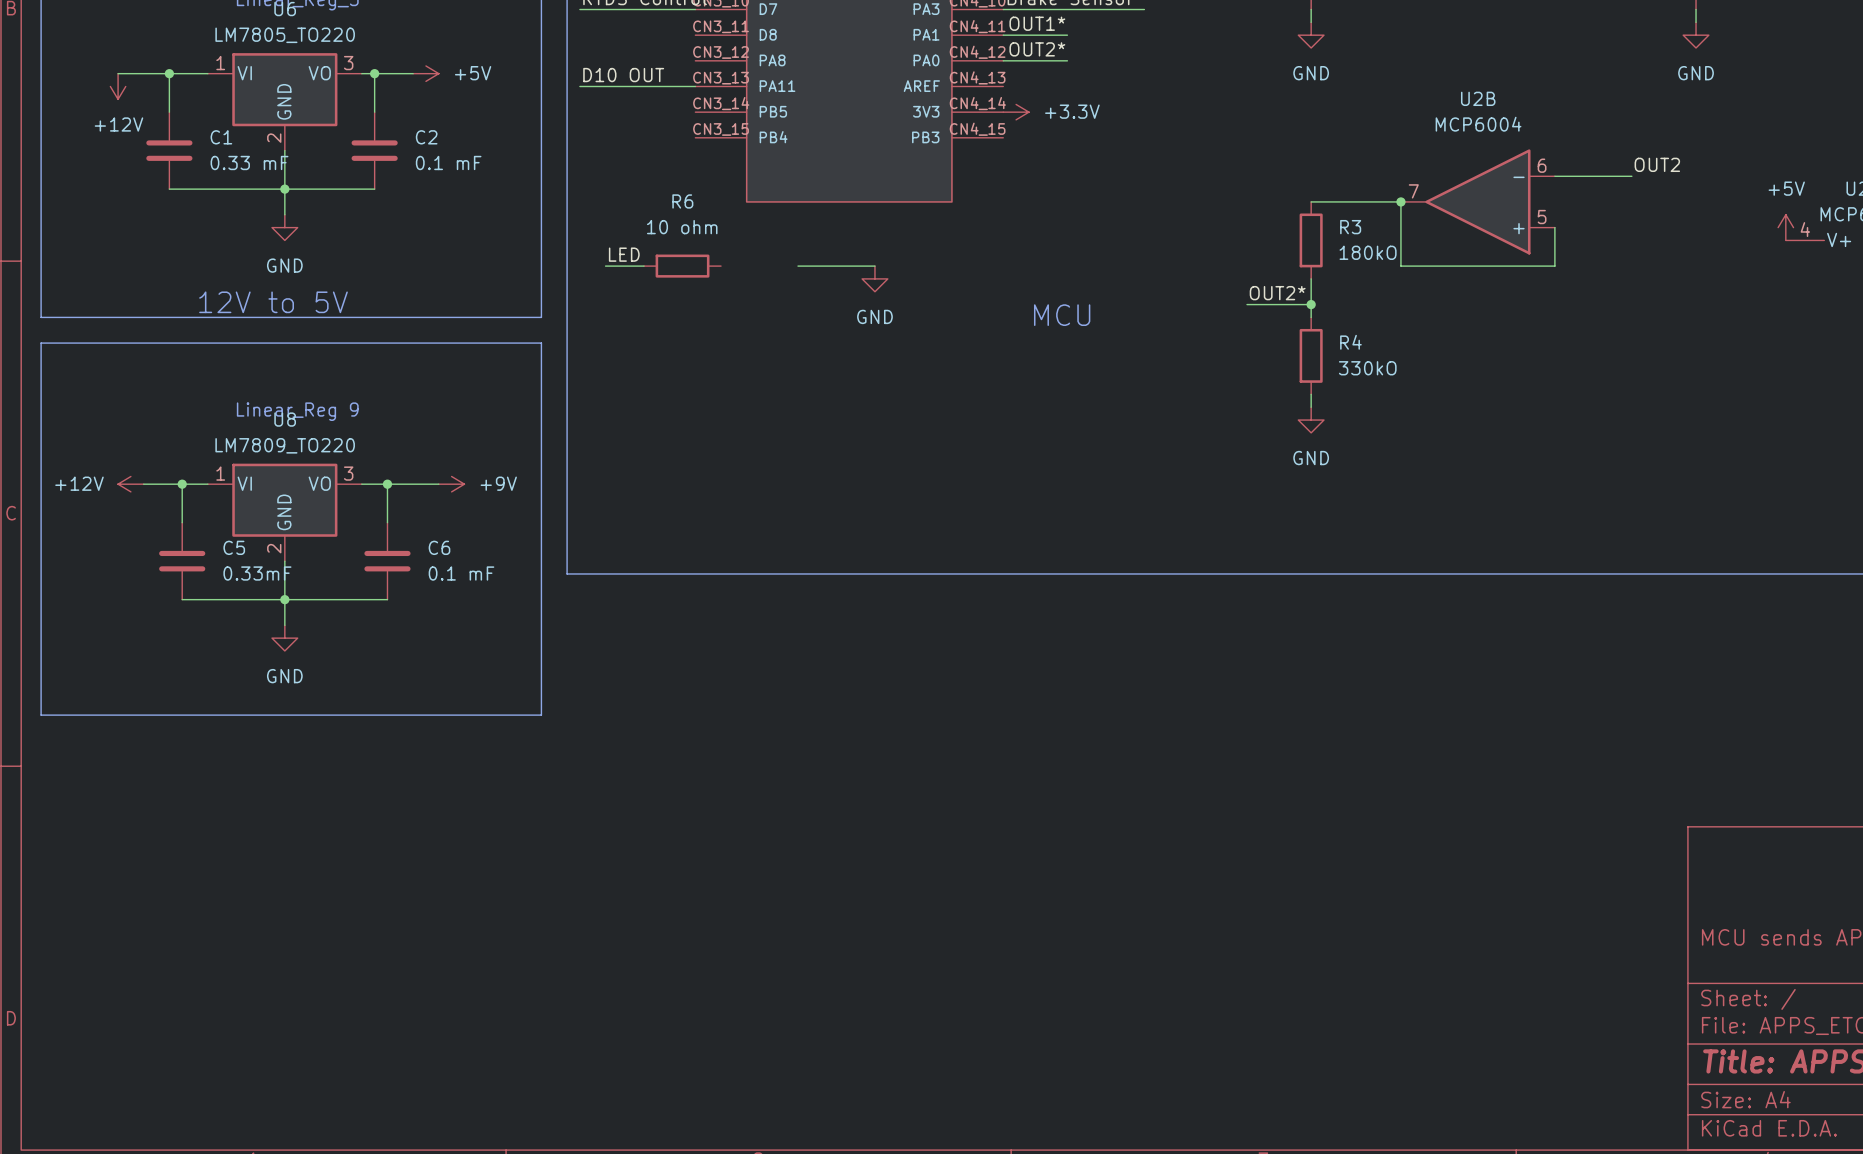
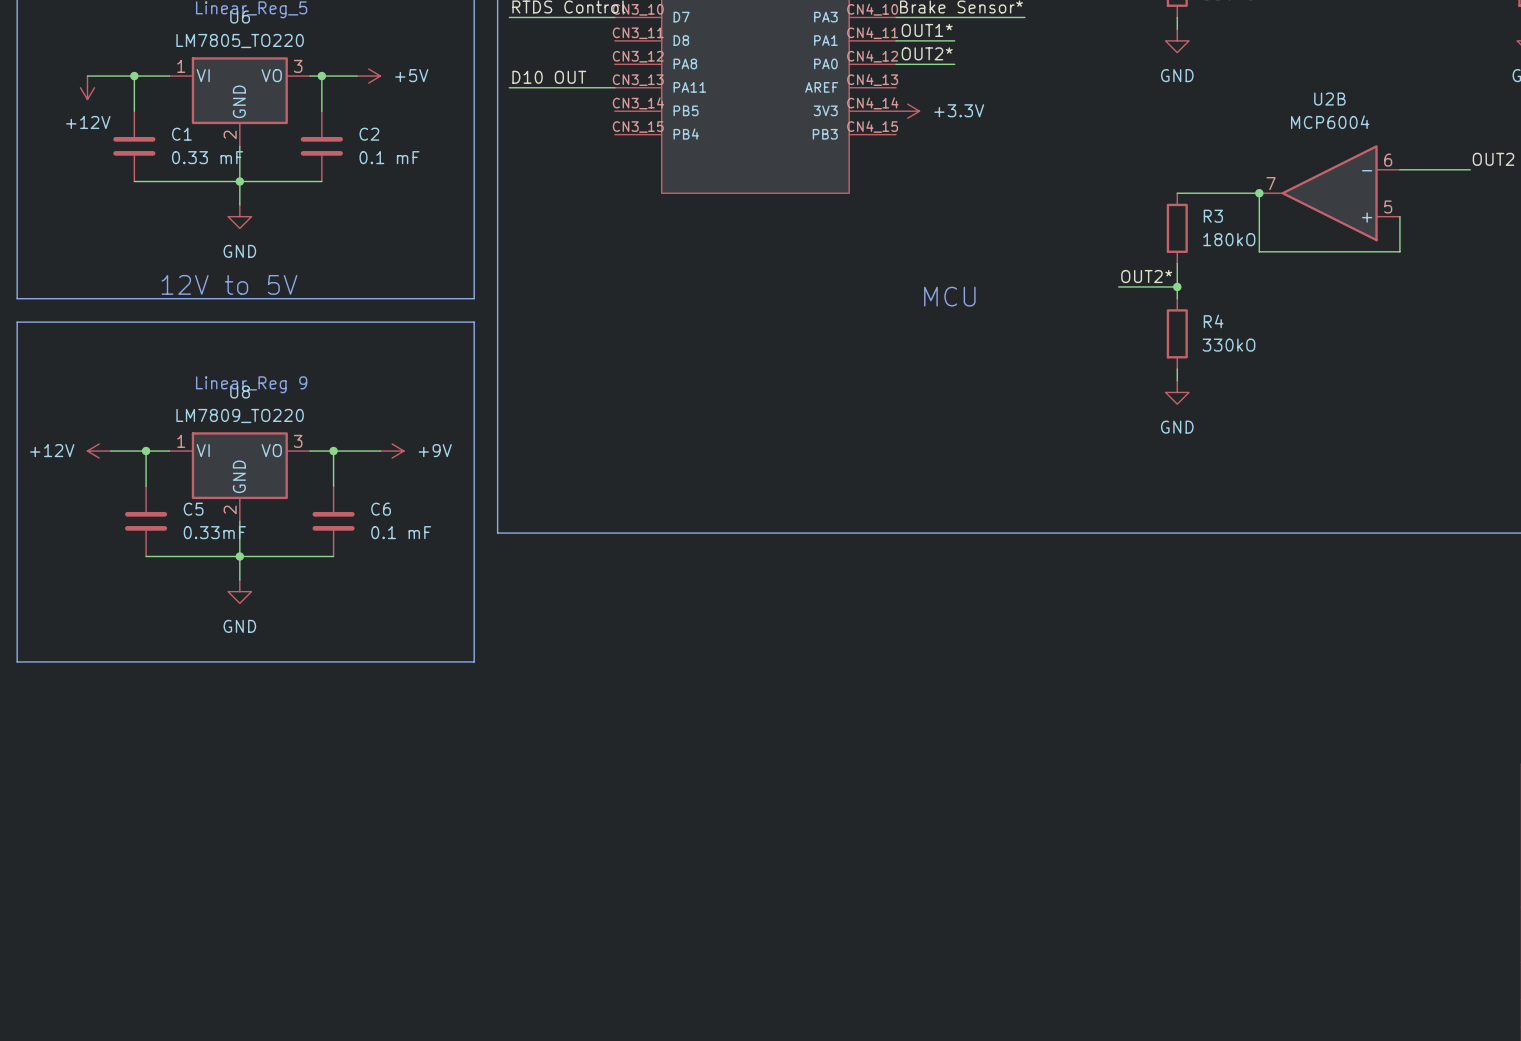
label: LED (624, 254) -> none
wire: (605, 266) (644, 266) -> none
R6: 10 ohm (682, 266) -> none
wire: (798, 266) (874, 266) -> none
power symbol: GND (874, 278) -> none

